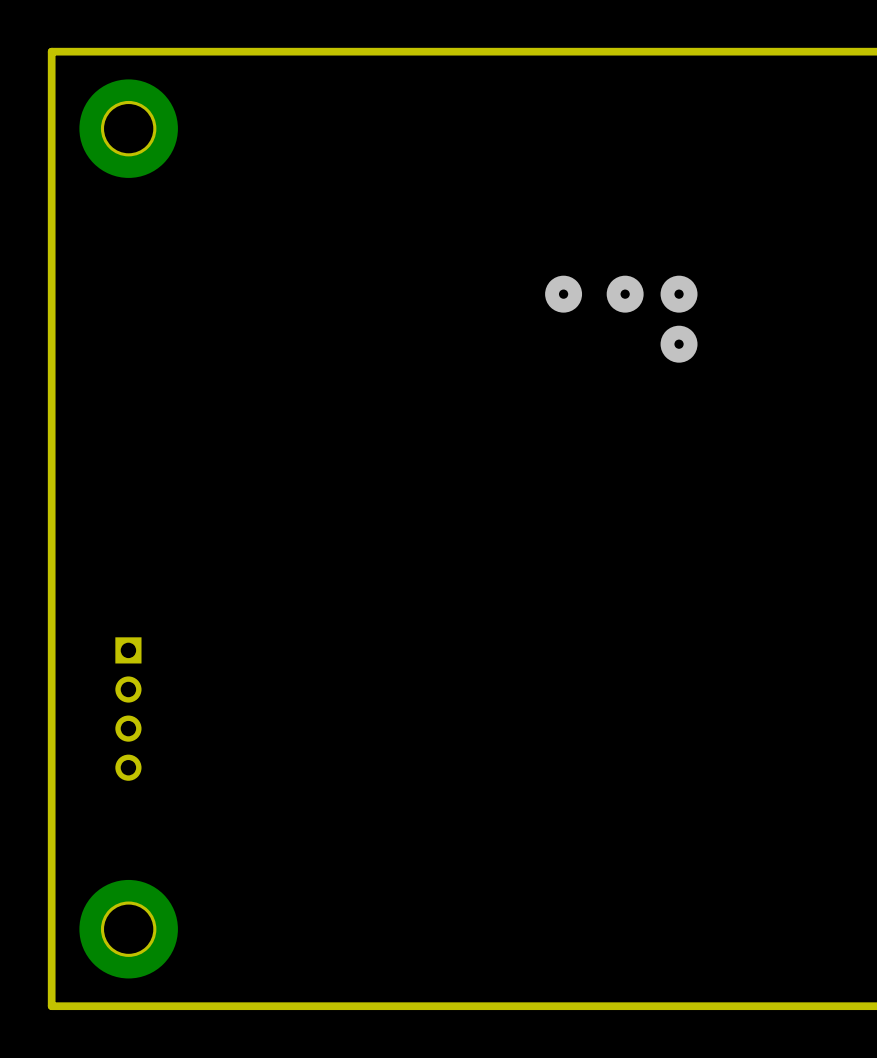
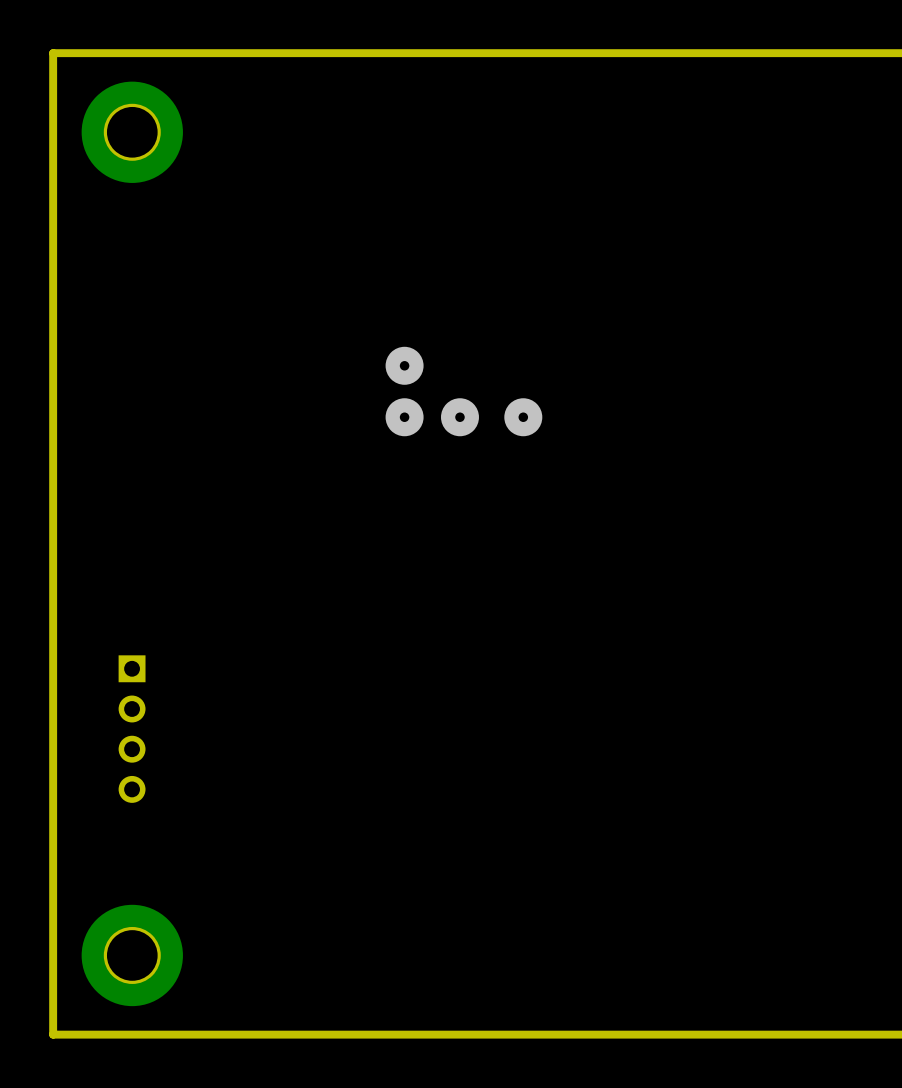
via: (563, 294) -> none
via: (625, 294) -> none
via: (679, 294) -> none
via: (679, 344) -> none
via: none -> (404, 365)
via: none -> (404, 417)
via: none -> (459, 417)
via: none -> (523, 417)

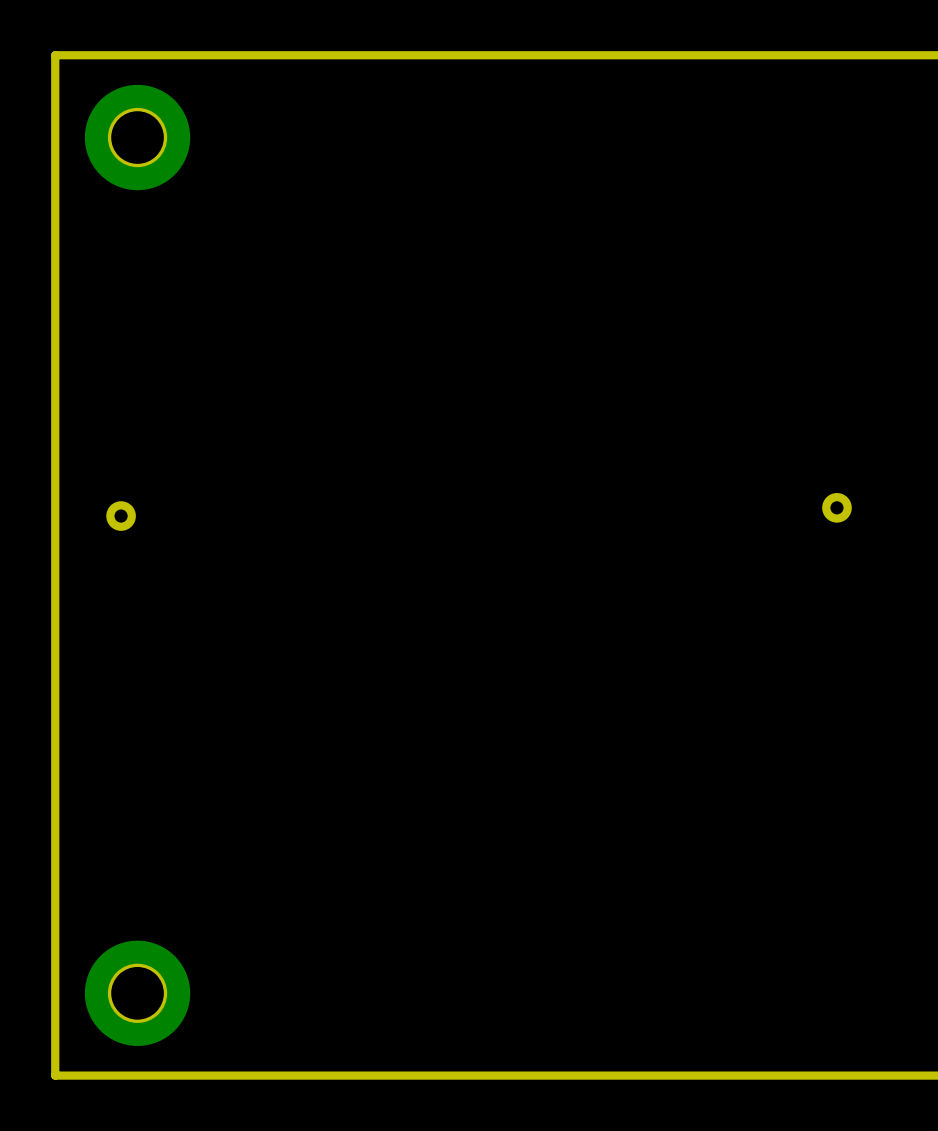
via: (404, 365) -> none
via: (404, 417) -> none
via: (459, 417) -> none
via: (523, 417) -> none
part: none -> (836, 507)
part: none -> (121, 516)
part: (132, 729) -> none

